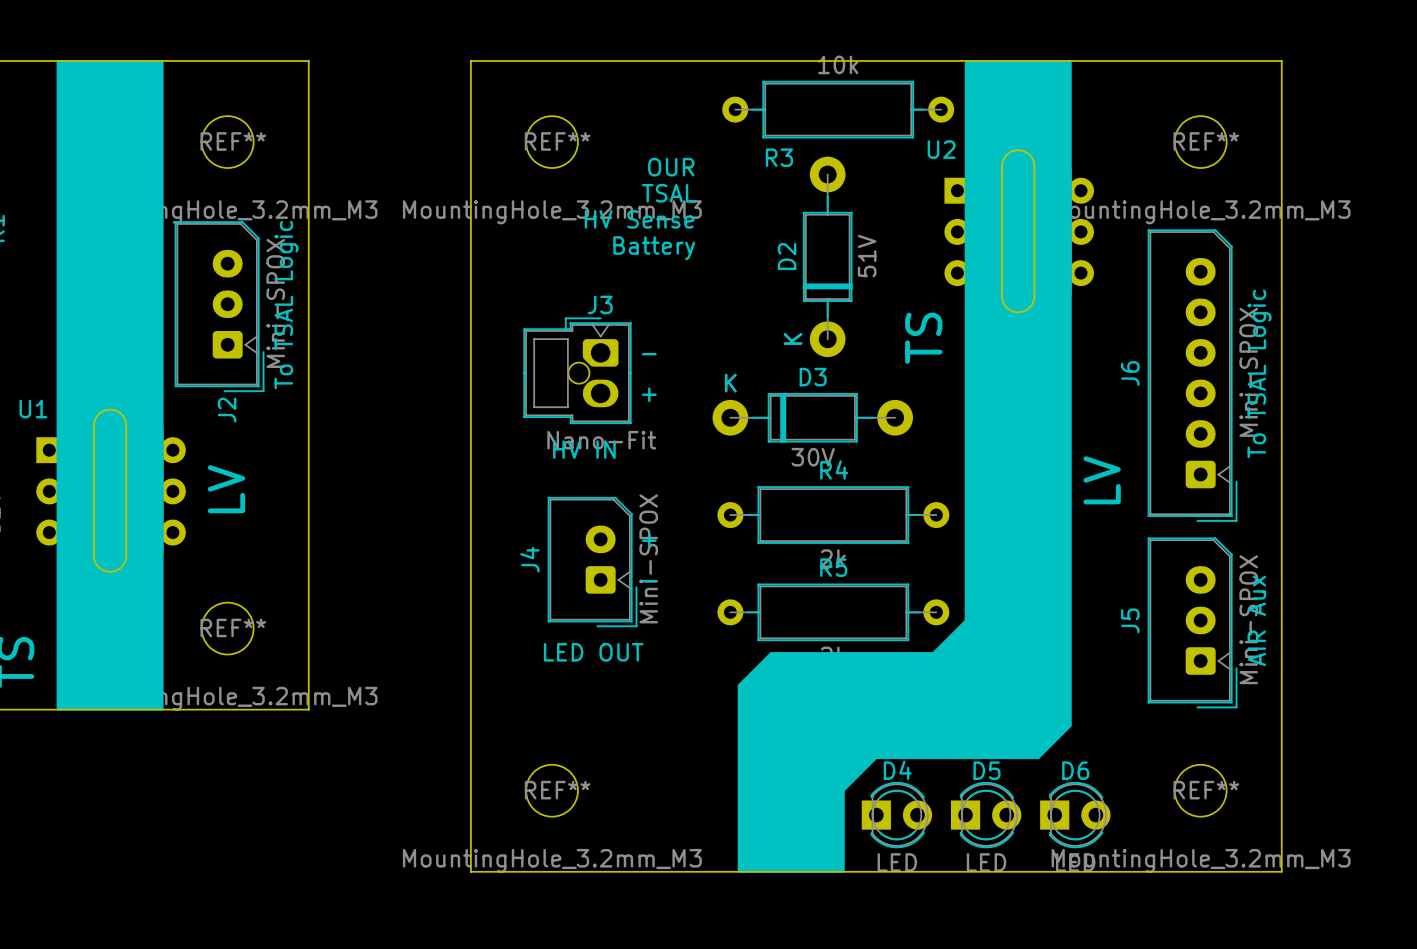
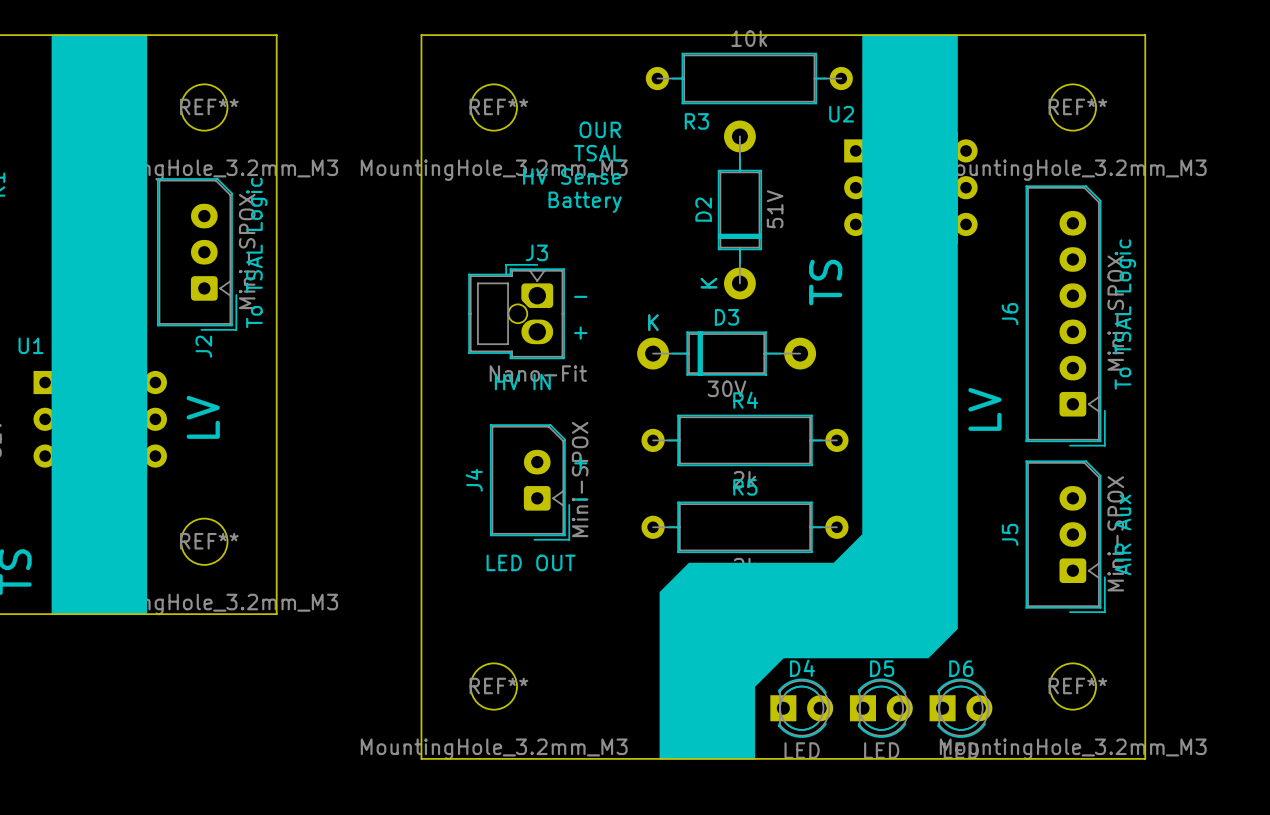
board edge: (1002, 166) (1002, 298) (1008, 308) (1020, 312) (1029, 307) (1034, 298) (1034, 164) (1029, 154) (1018, 150) (1006, 154) (1002, 166) -> none
board edge: (93, 425) (94, 557) (100, 568) (112, 571) (121, 567) (126, 557) (126, 423) (121, 414) (110, 409) (98, 414) (93, 425) -> none

